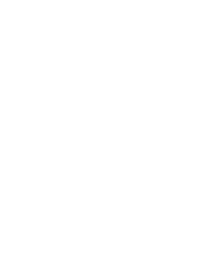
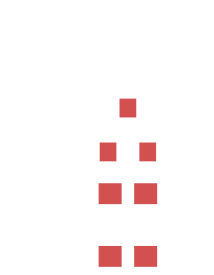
part: none -> (127, 129)
part: none -> (127, 193)
part: none -> (127, 256)

